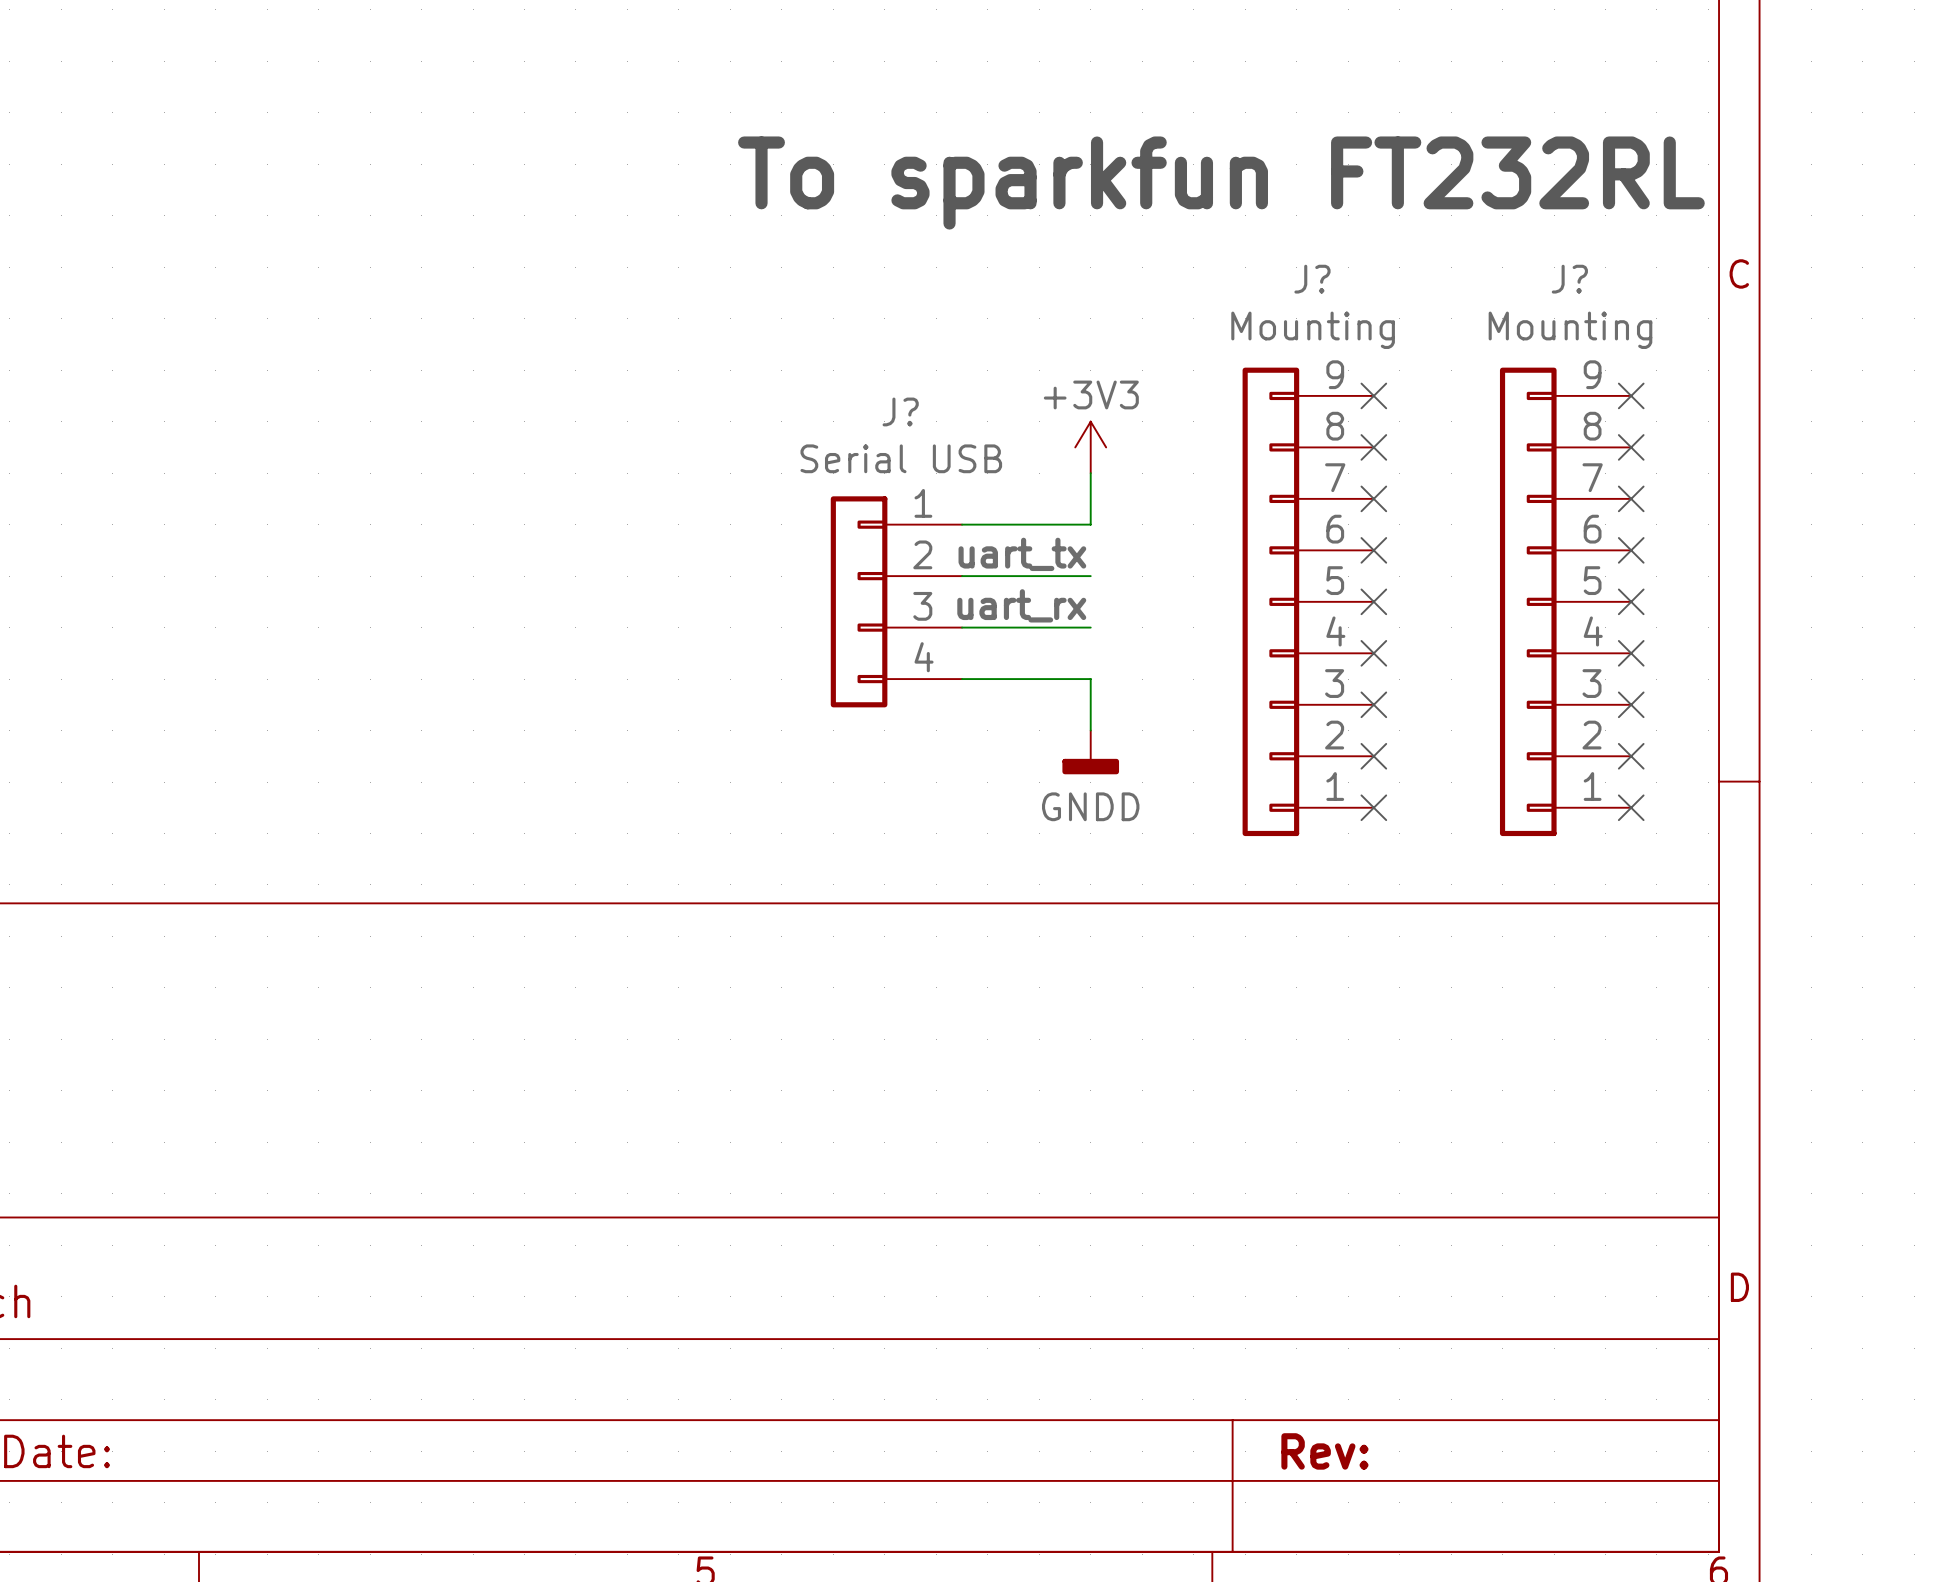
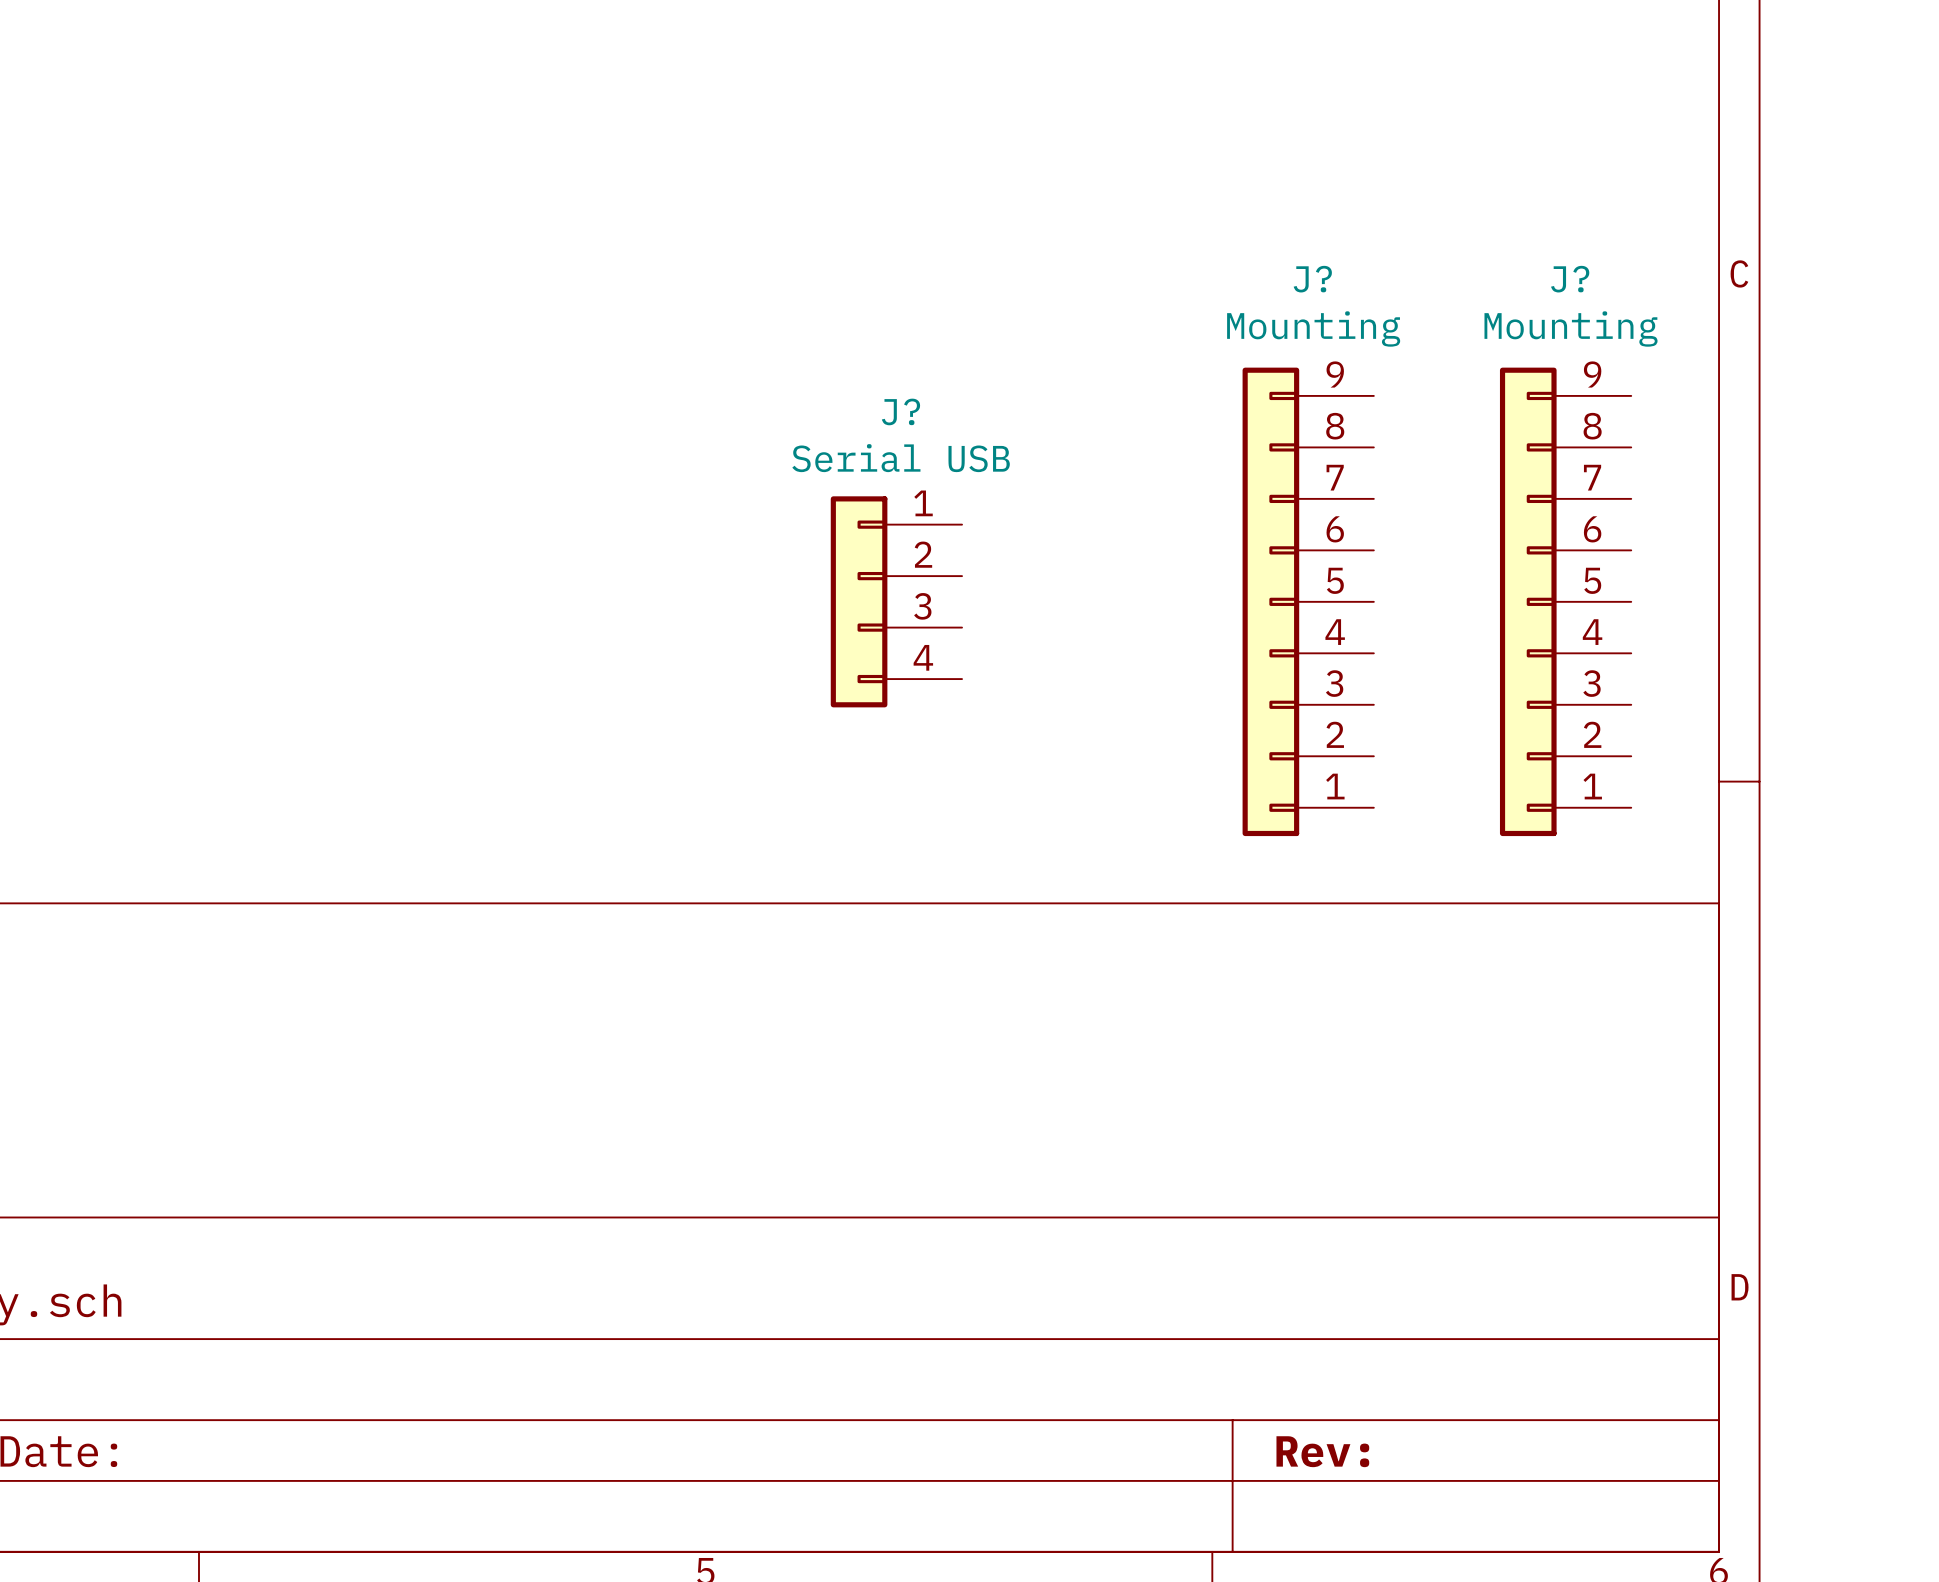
text: To sparkfun FT232RL (1221, 183) -> none
no-connect mark: (1373, 395) -> none
no-connect mark: (1631, 395) -> none
power symbol: +3V3 (1090, 447) -> none
no-connect mark: (1373, 447) -> none
no-connect mark: (1631, 447) -> none
wire: (1090, 473) (1090, 524) (962, 524) -> none
no-connect mark: (1373, 498) -> none
no-connect mark: (1631, 498) -> none
no-connect mark: (1373, 550) -> none
no-connect mark: (1631, 550) -> none
label: uart_tx (1022, 554) -> none
wire: (962, 576) (1090, 576) -> none
no-connect mark: (1373, 601) -> none
no-connect mark: (1631, 601) -> none
label: uart_rx (1021, 605) -> none
wire: (962, 627) (1090, 627) -> none
no-connect mark: (1373, 653) -> none
no-connect mark: (1631, 653) -> none
wire: (962, 679) (1090, 679) (1090, 730) -> none
no-connect mark: (1373, 704) -> none
no-connect mark: (1631, 704) -> none
power symbol: GNDD (1090, 752) -> none
no-connect mark: (1373, 756) -> none
no-connect mark: (1631, 756) -> none
no-connect mark: (1373, 807) -> none
no-connect mark: (1631, 807) -> none

